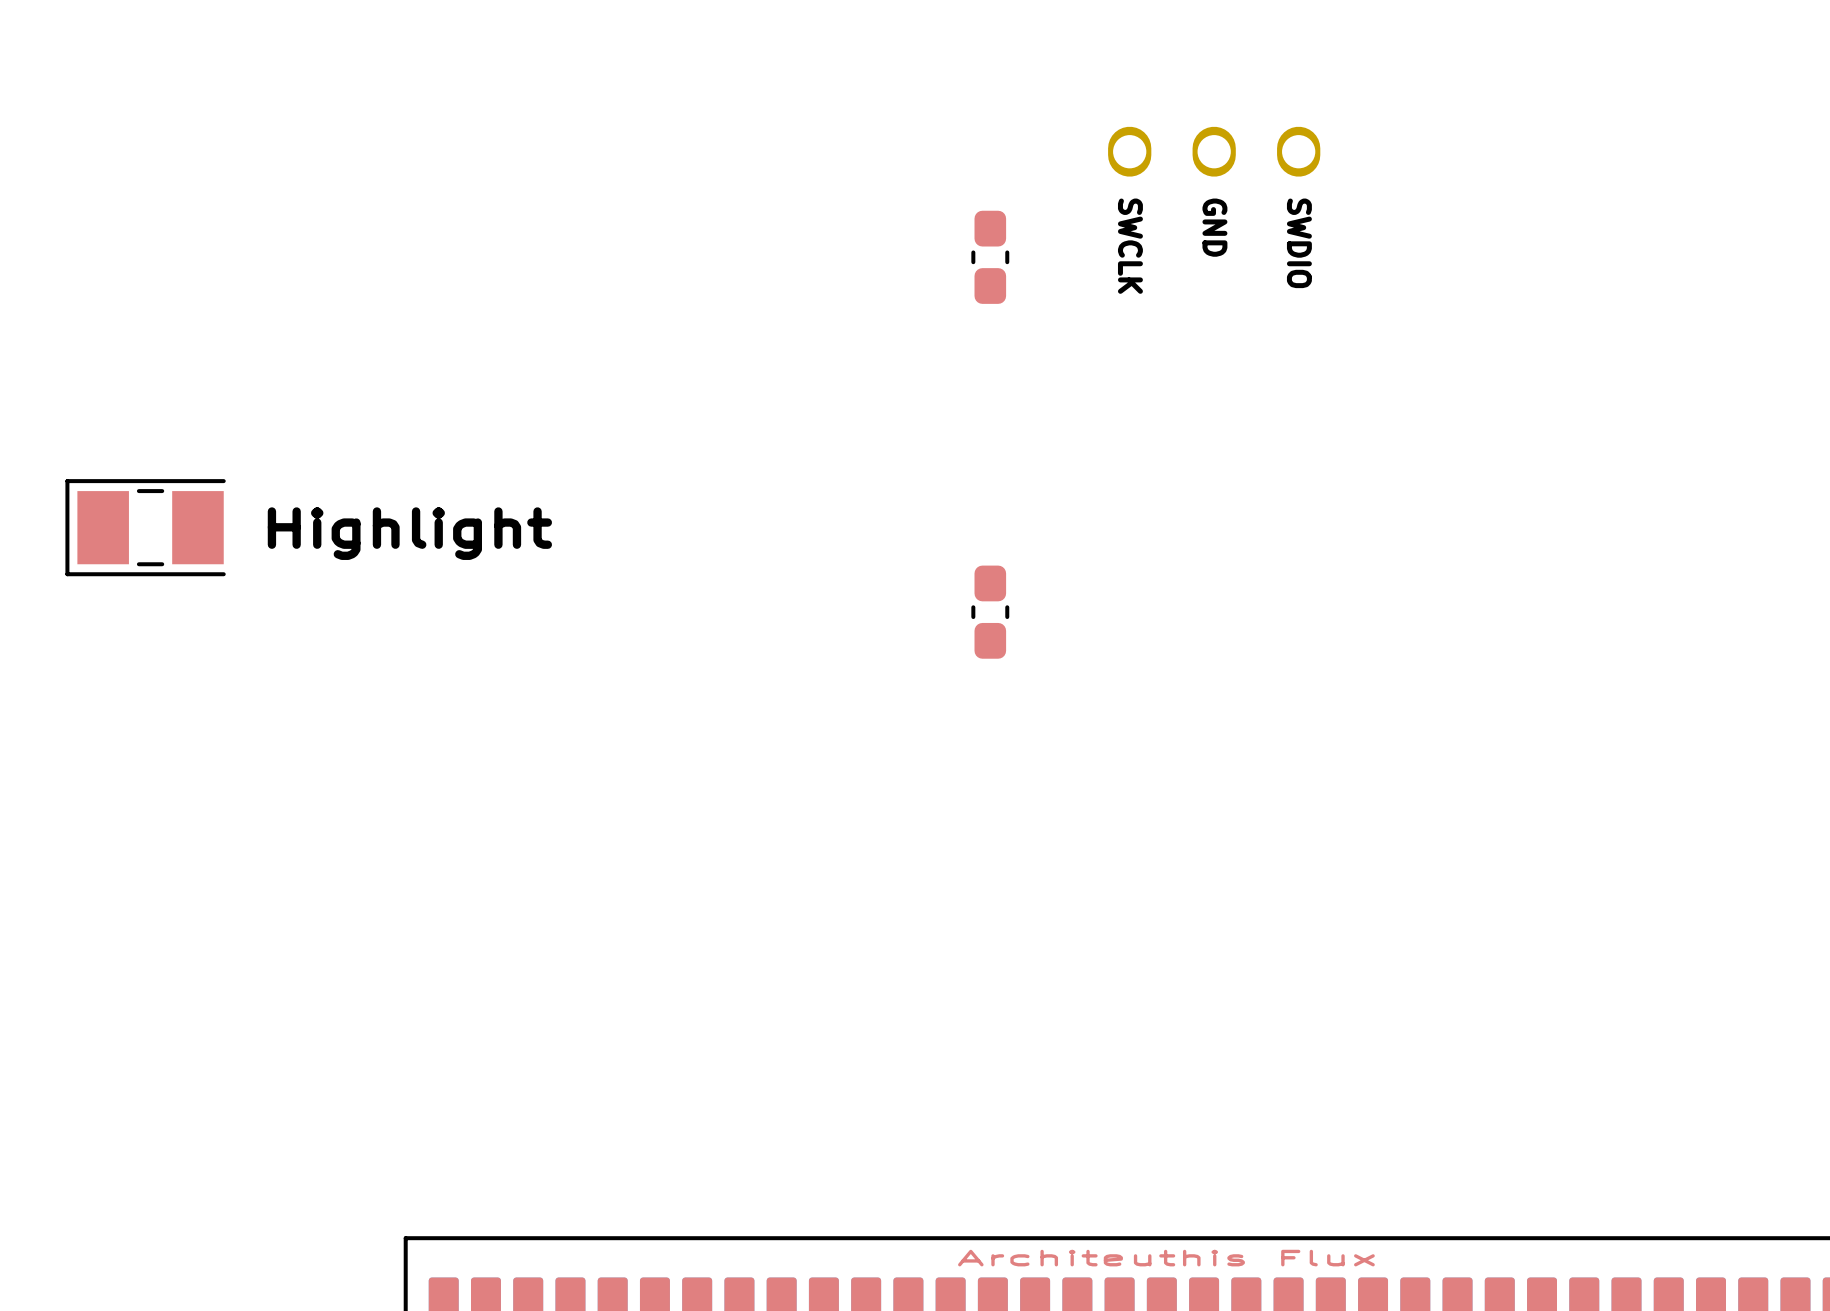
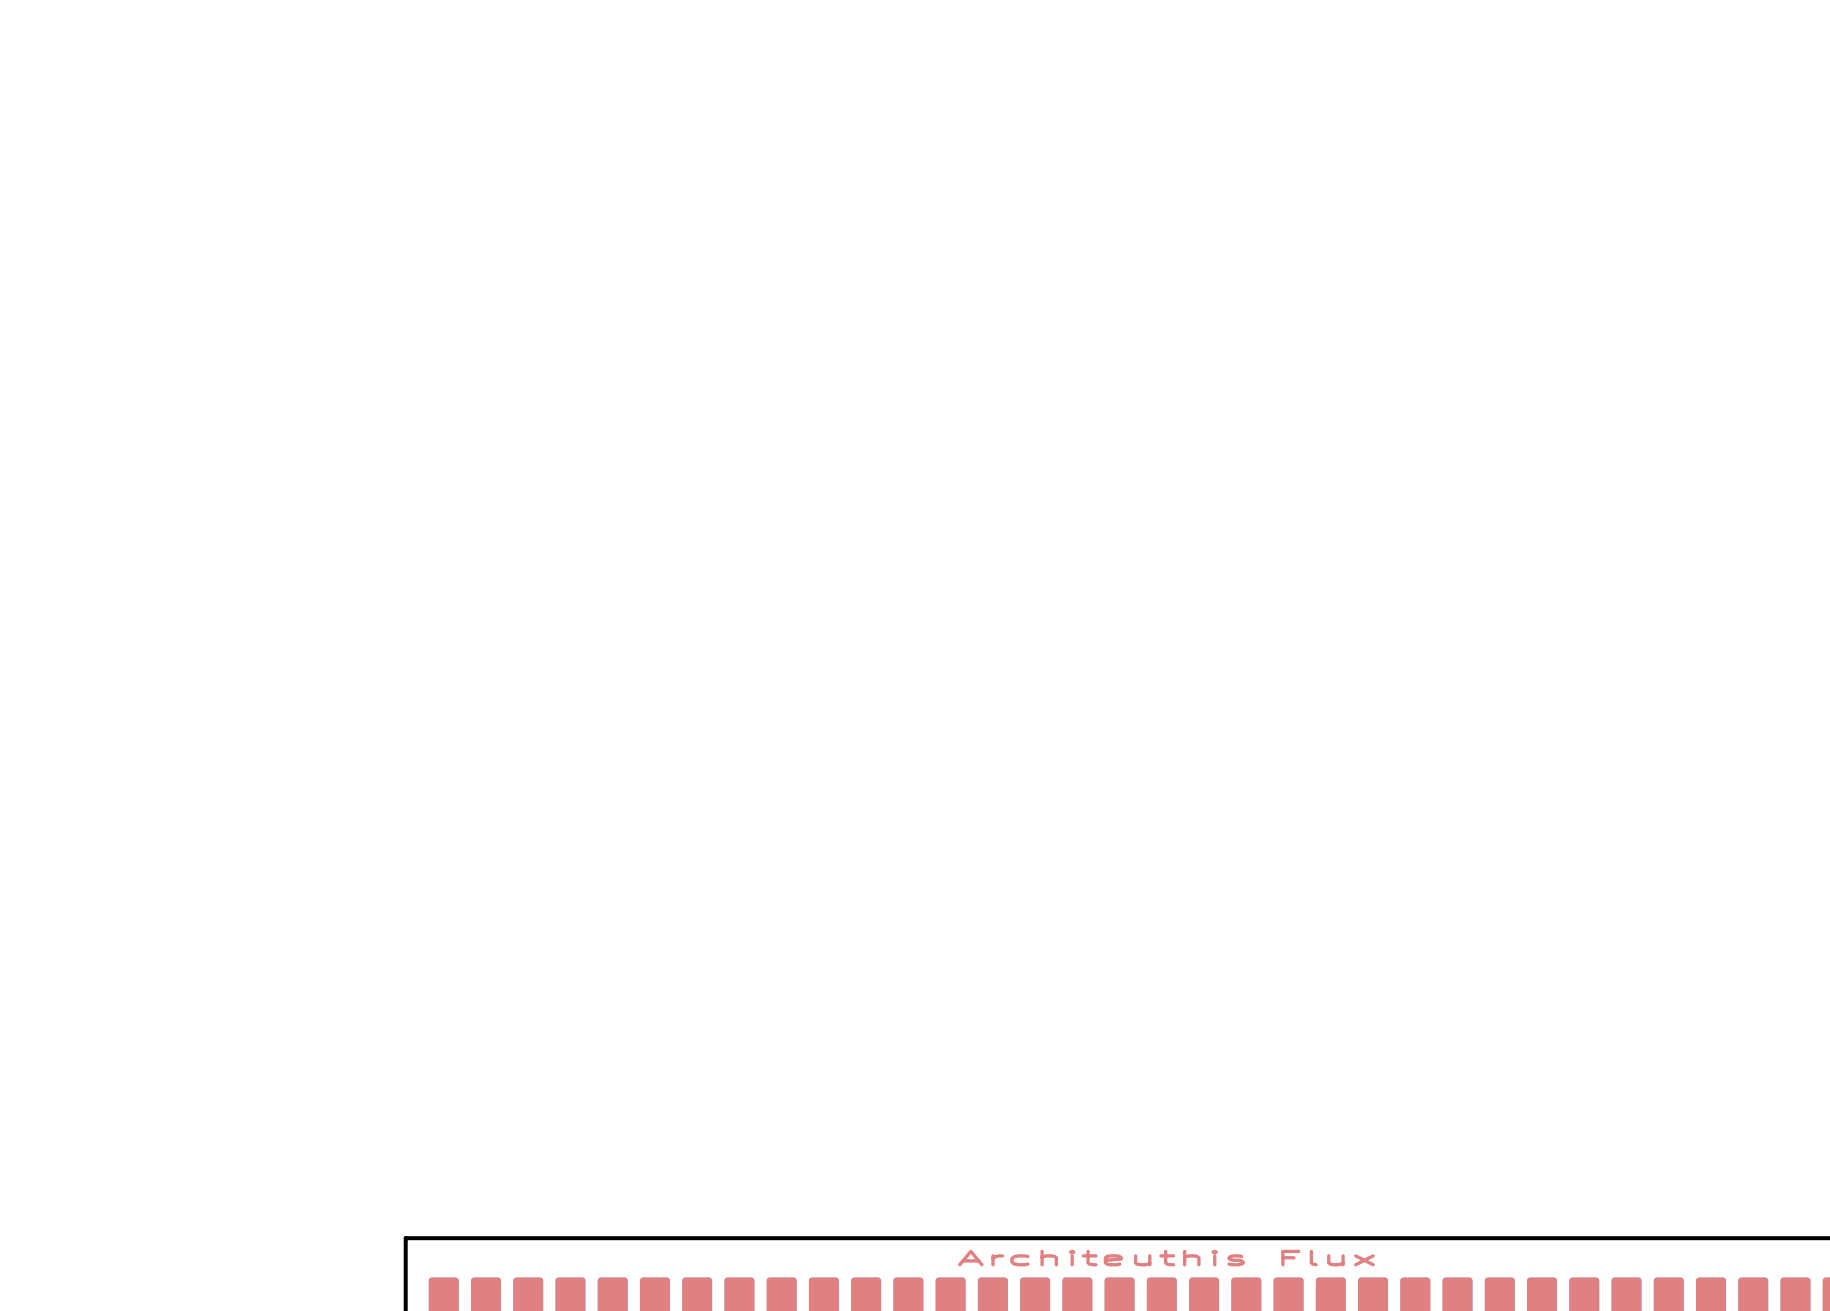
part: (1214, 151) -> none
part: (990, 257) -> none
part: (145, 527) -> none
text: Highlight (409, 533) -> none
part: (990, 612) -> none

